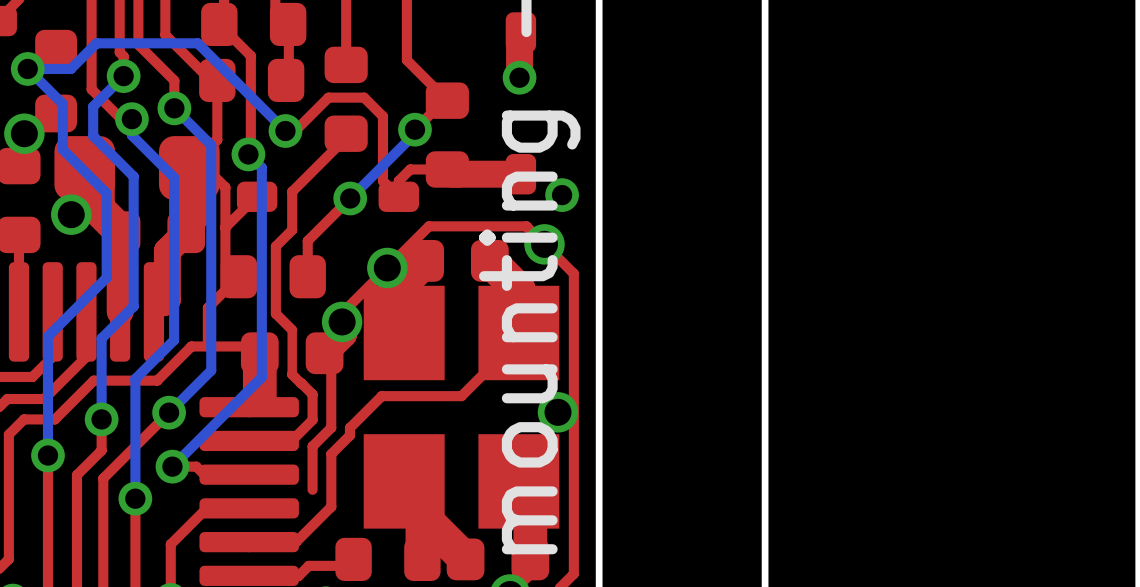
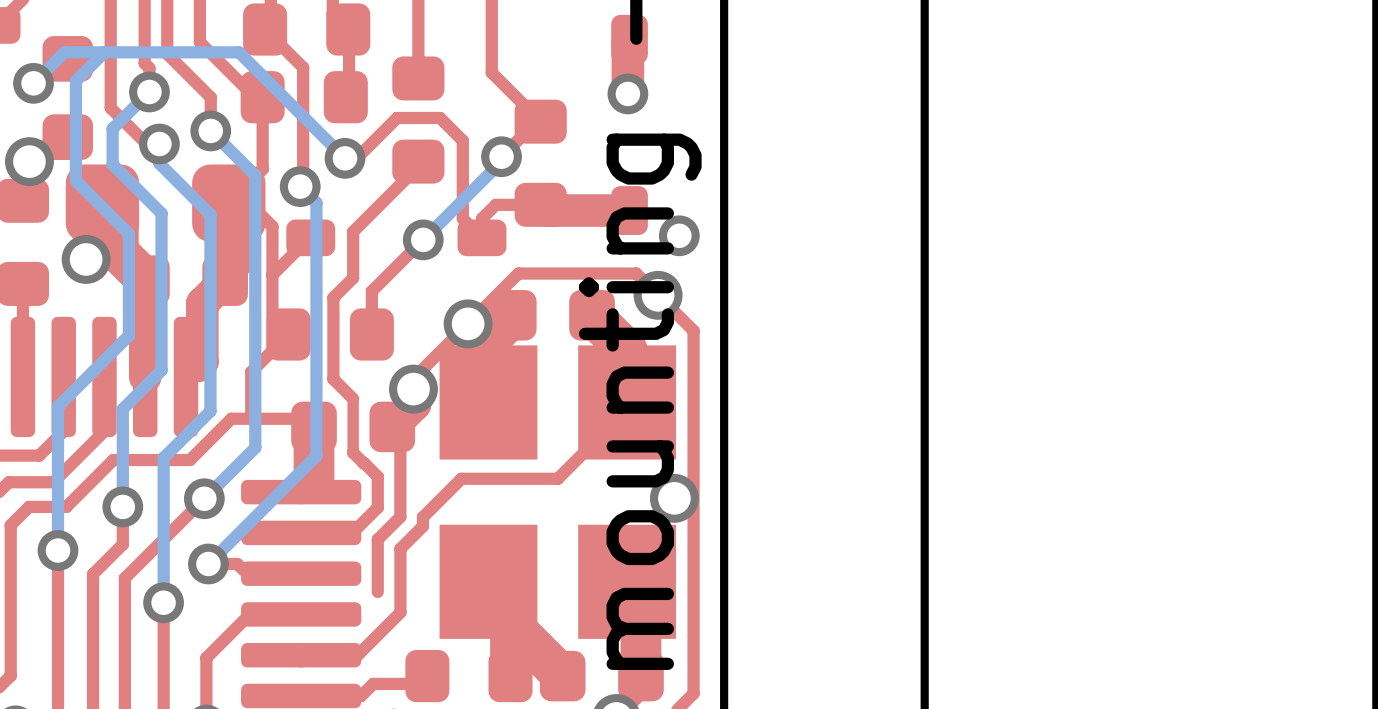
bottom track: (96, 43) (70, 68) (27, 68) (62, 104) -> (104, 52) (75, 80) (75, 125)
bottom track: none -> (116, 52) (64, 52) (33, 83)

